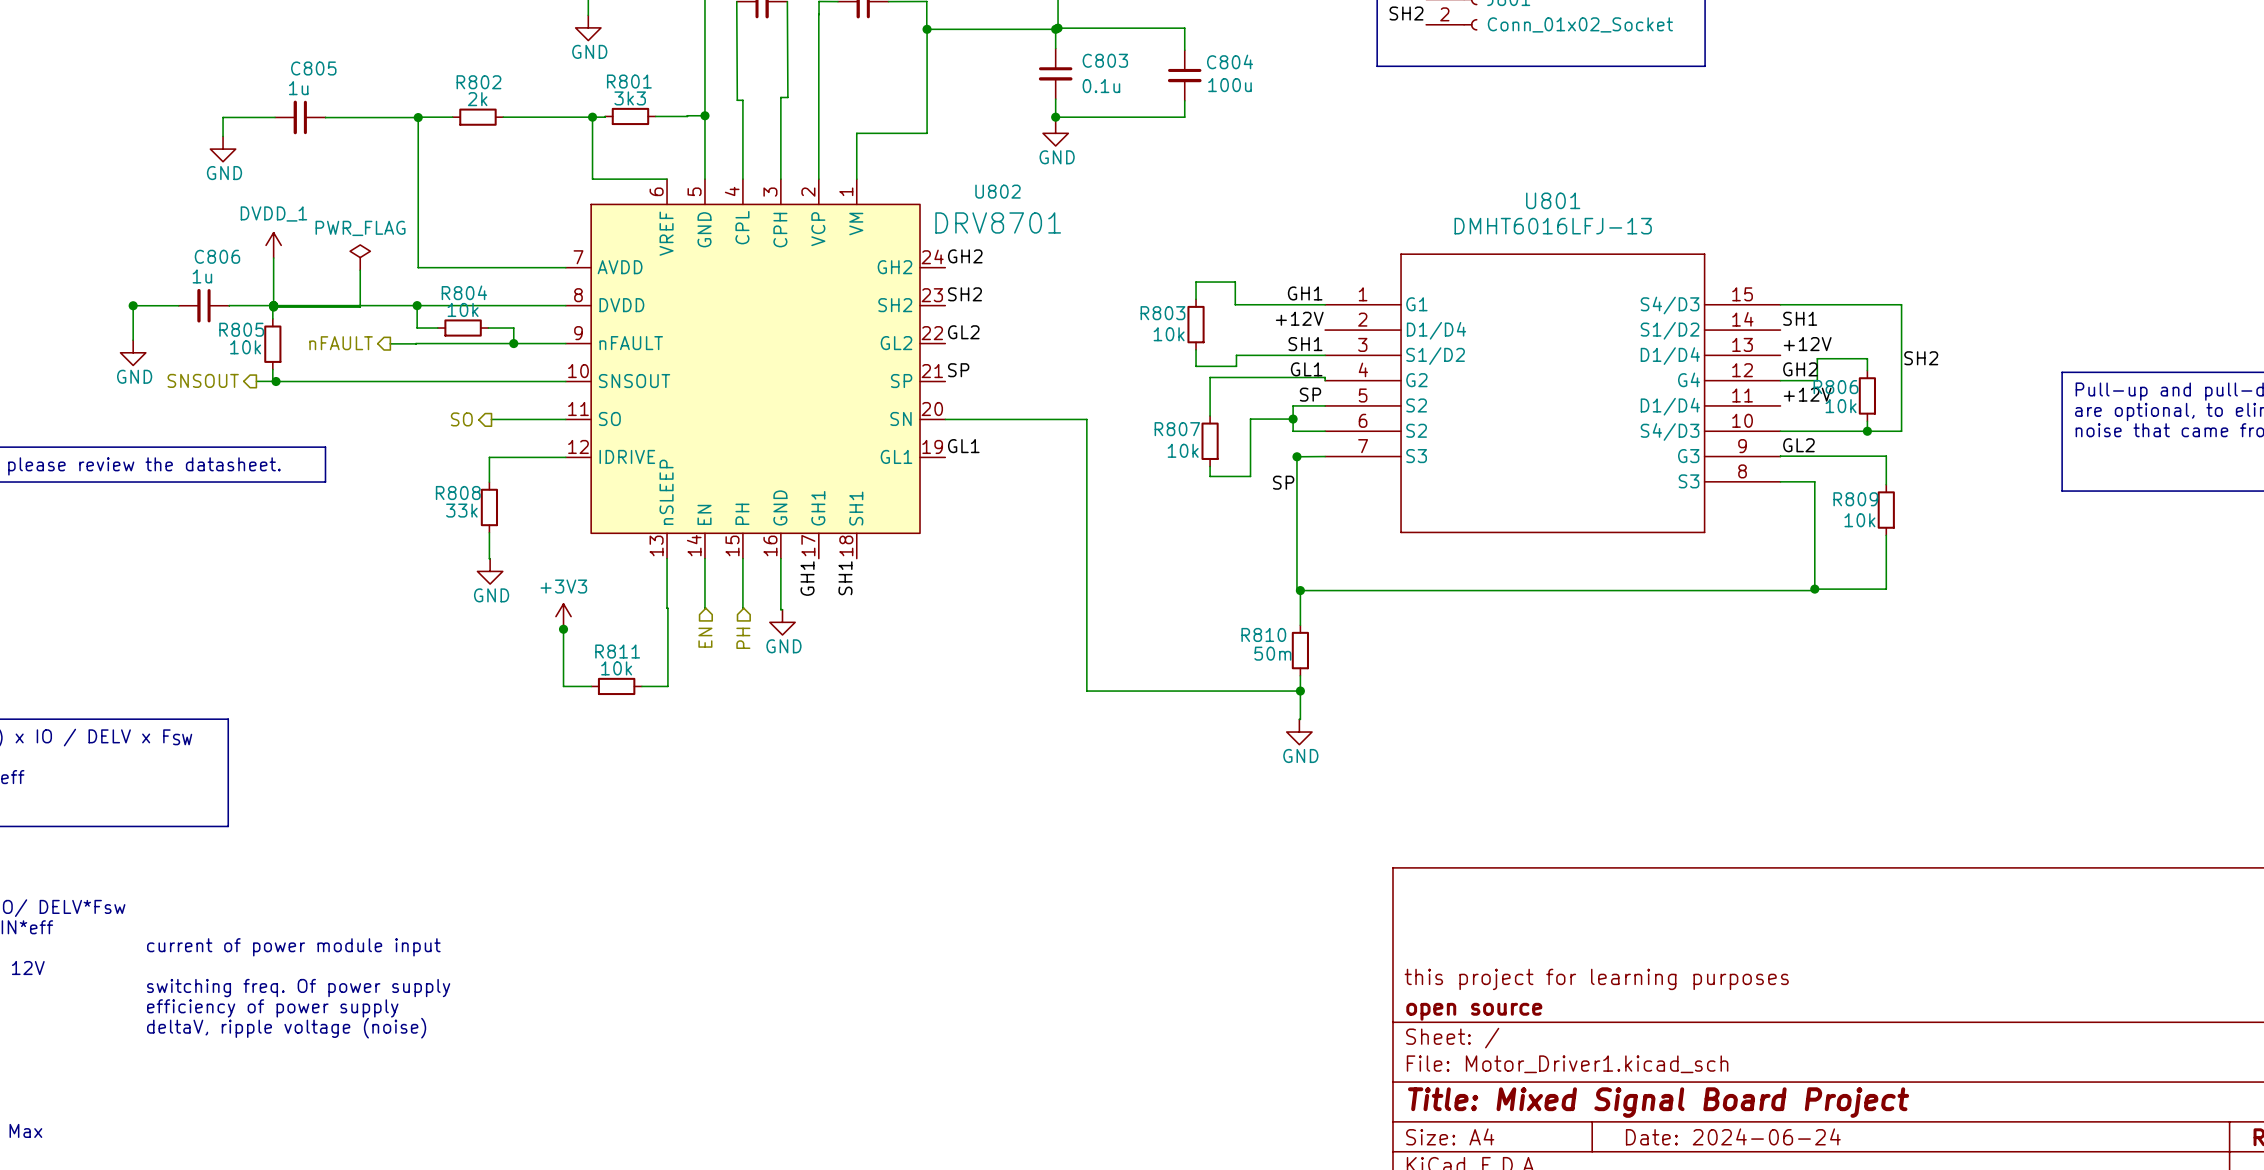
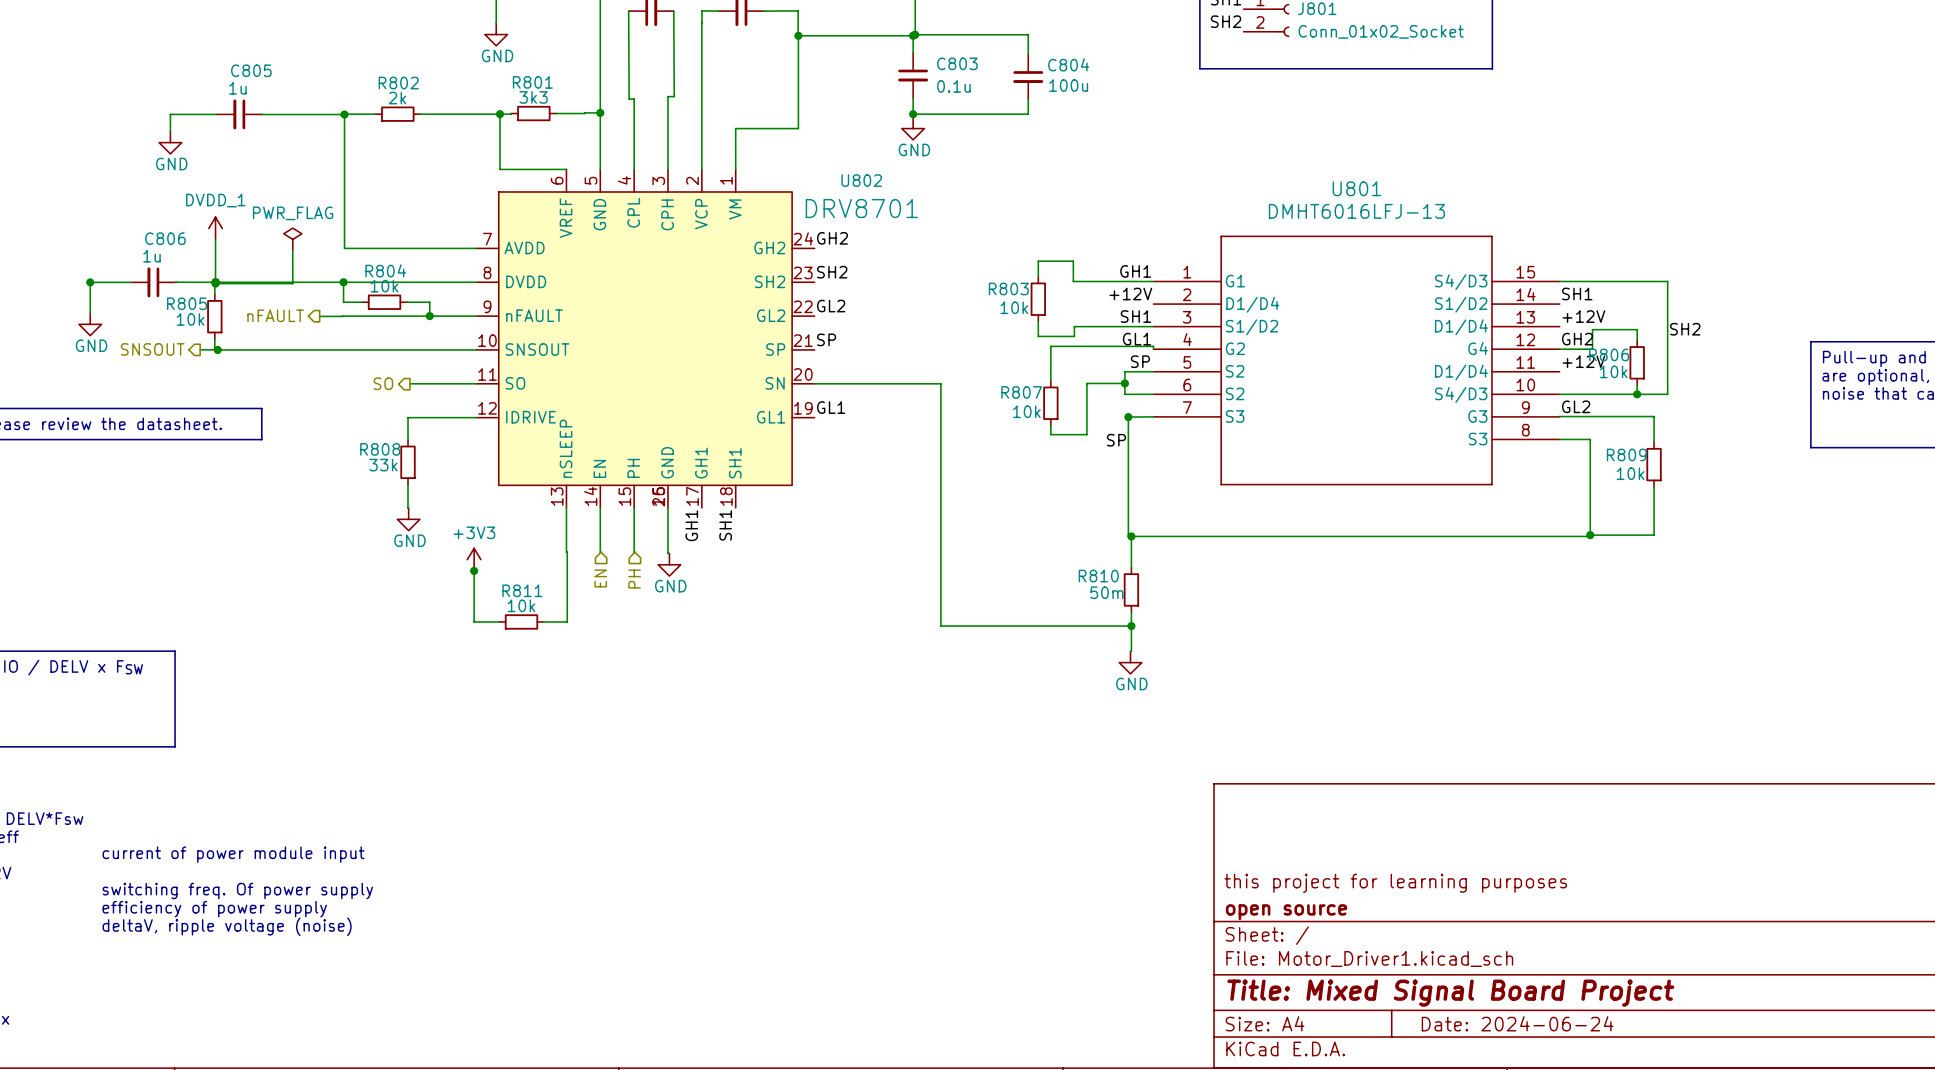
U802 symbol: [565, 179, 946, 559] -> [476, 169, 815, 508]

